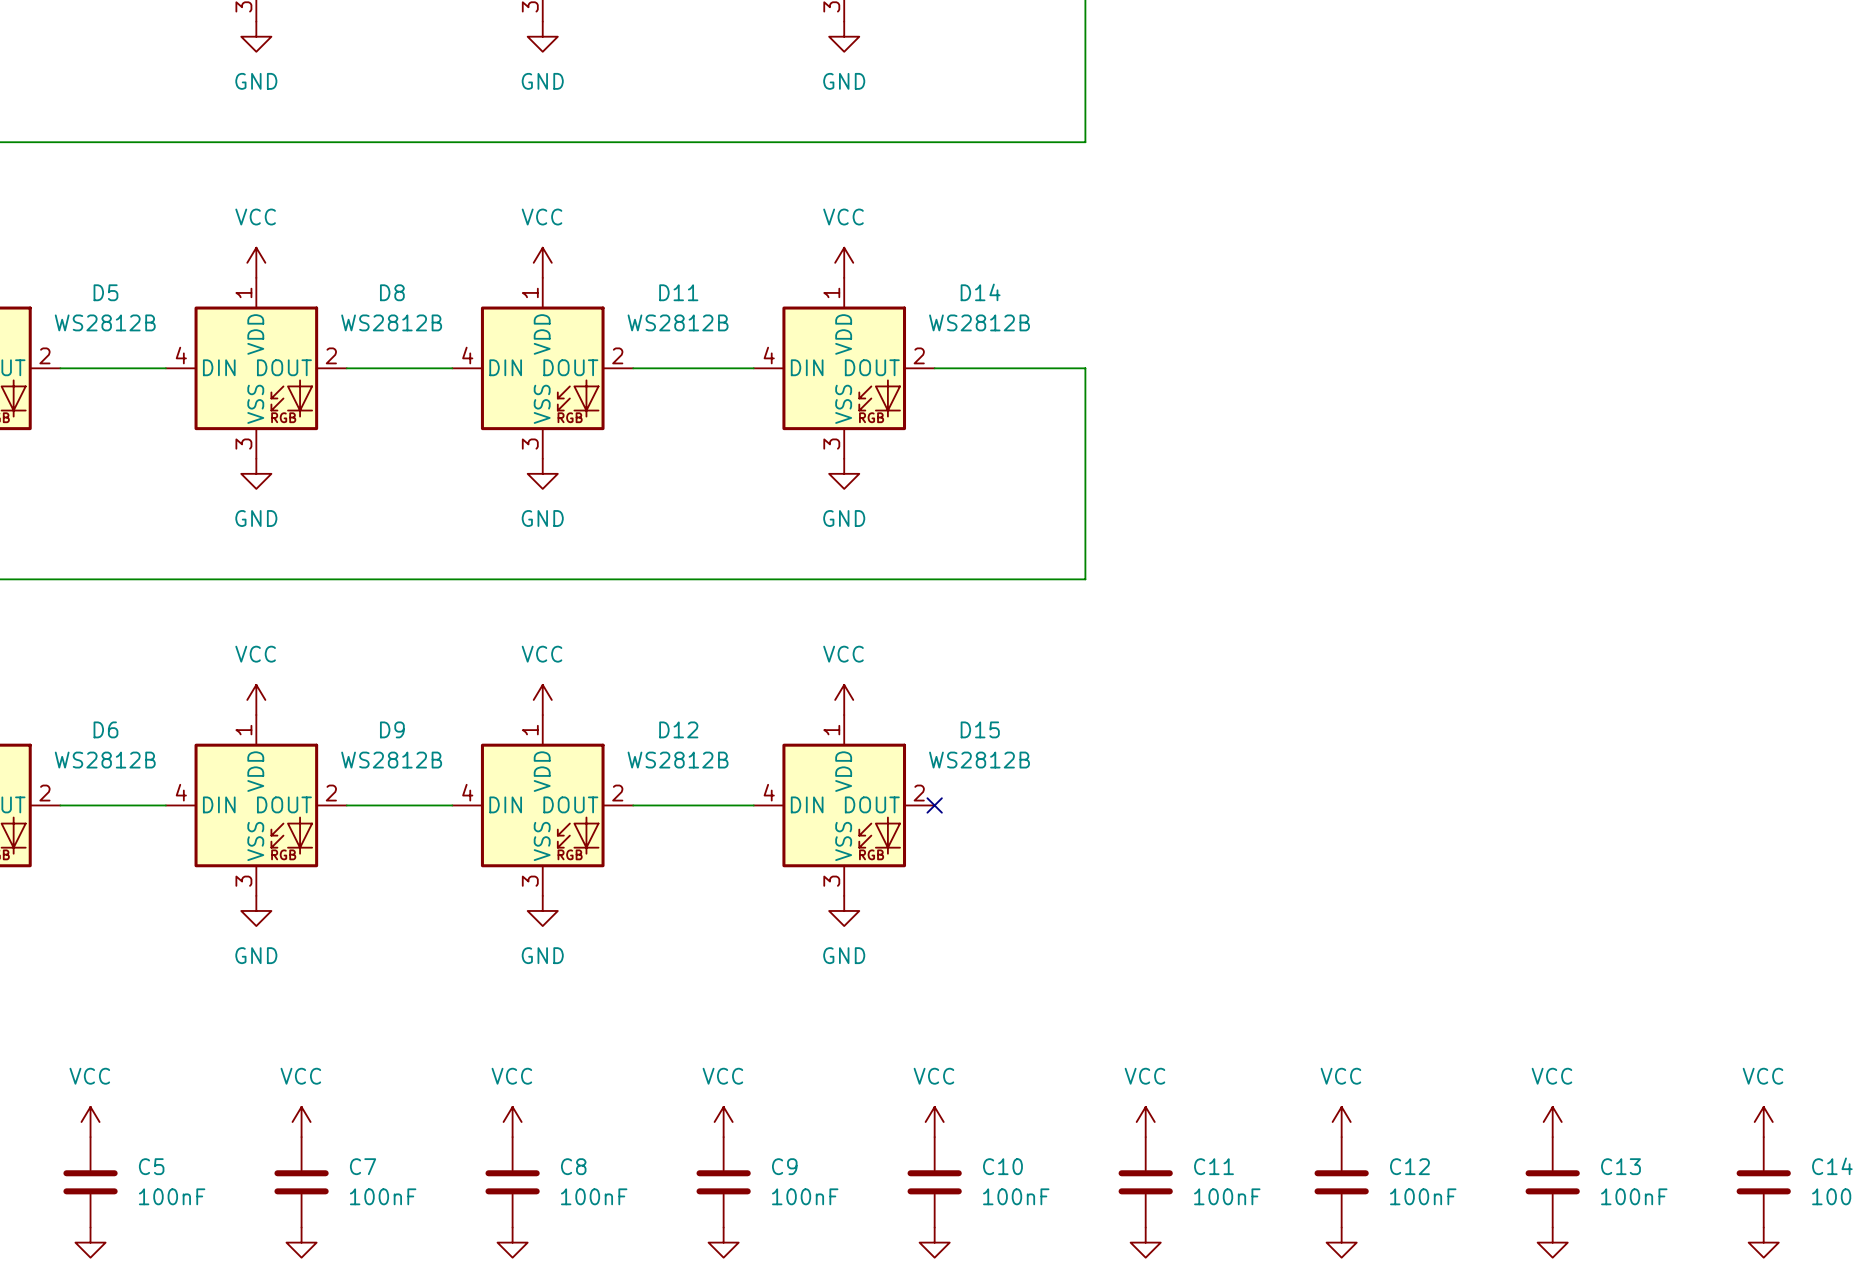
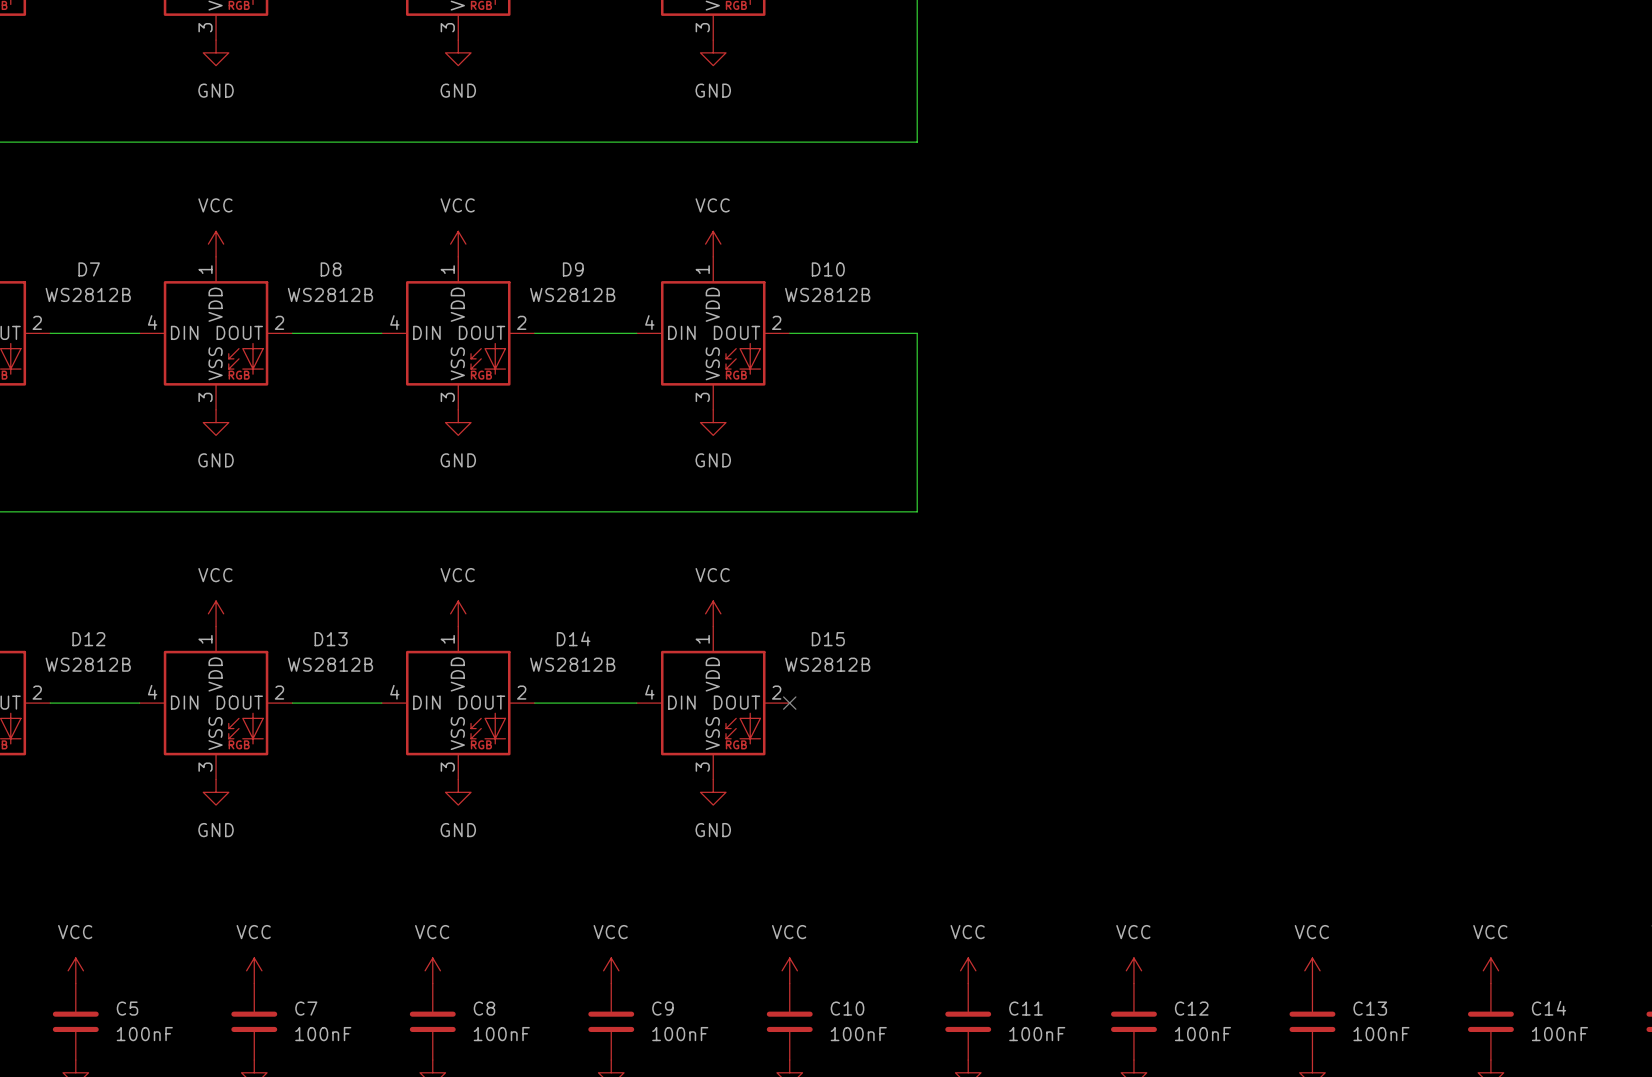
D5 name: D5 (105, 292) -> D7 (89, 269)
D11 name: D11 (678, 292) -> D9 (573, 269)
D14 name: D14 (980, 292) -> D10 (828, 269)
D6 name: D6 (105, 729) -> D12 (88, 639)
D9 name: D9 (392, 729) -> D13 (331, 639)
D12 name: D12 (678, 729) -> D14 (573, 638)

